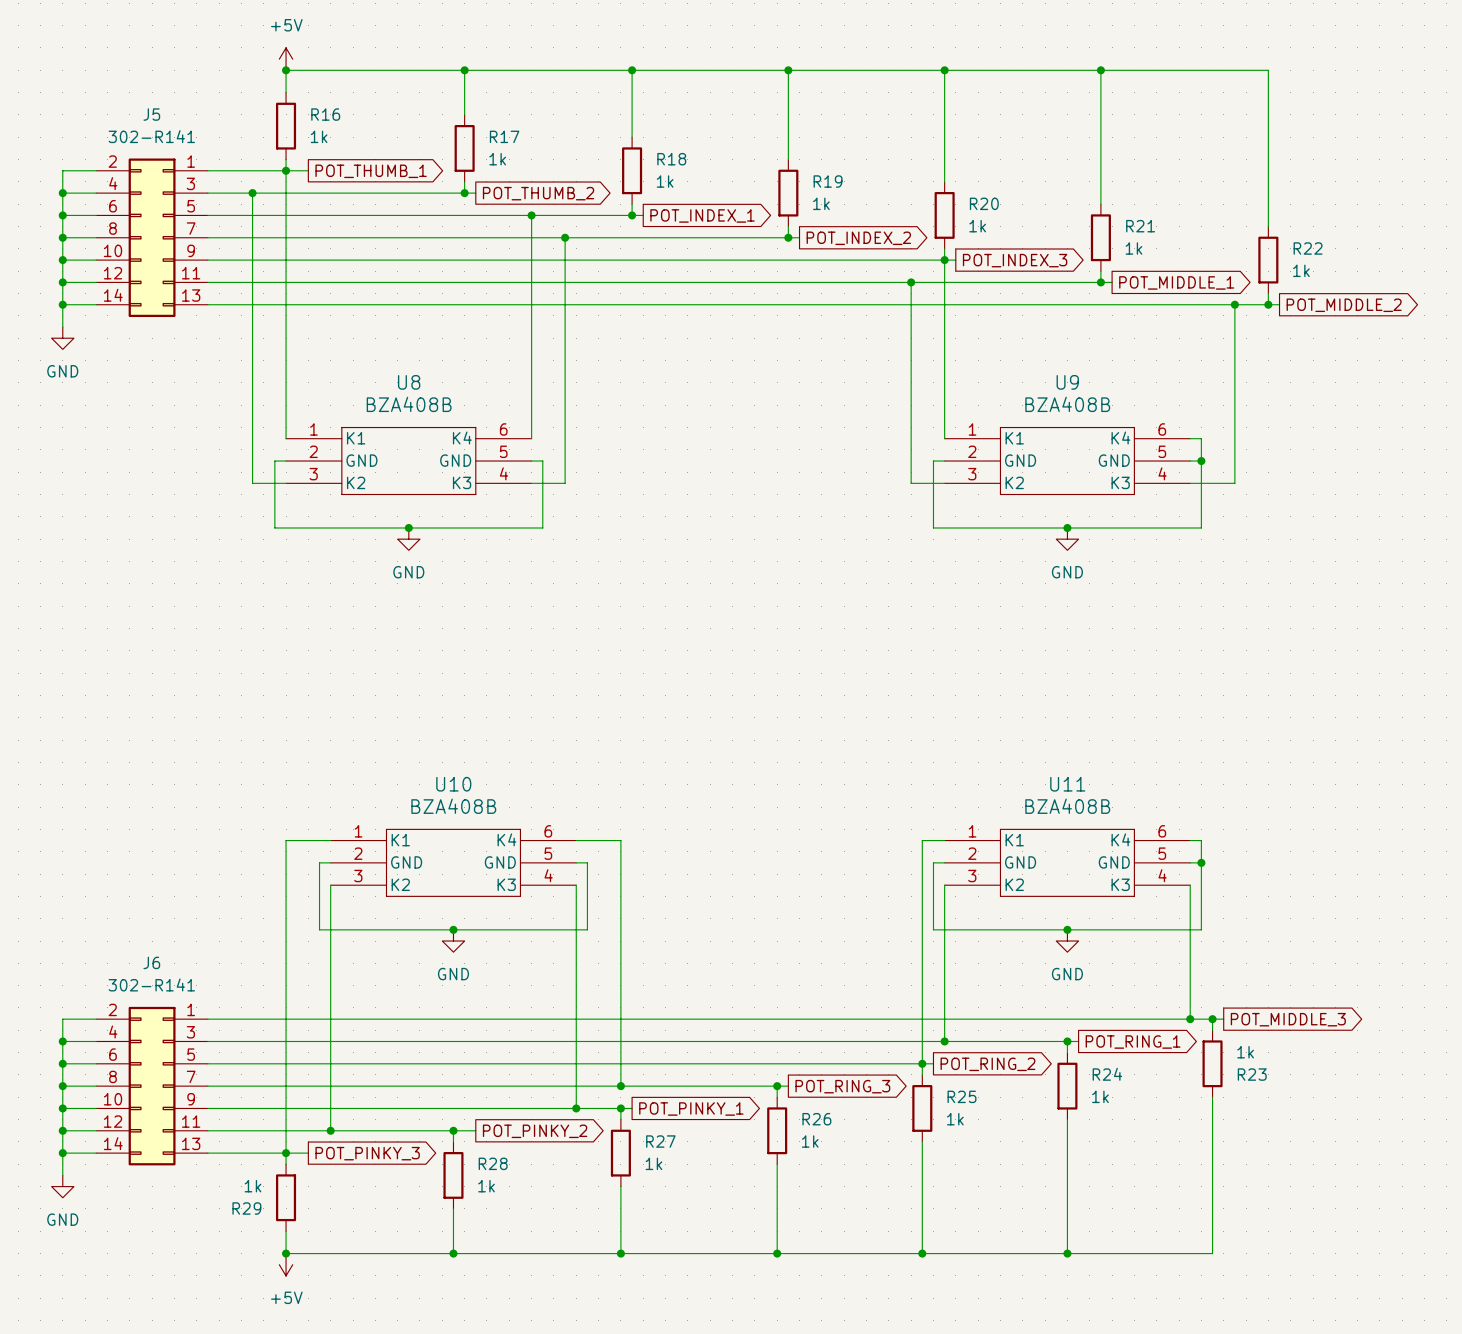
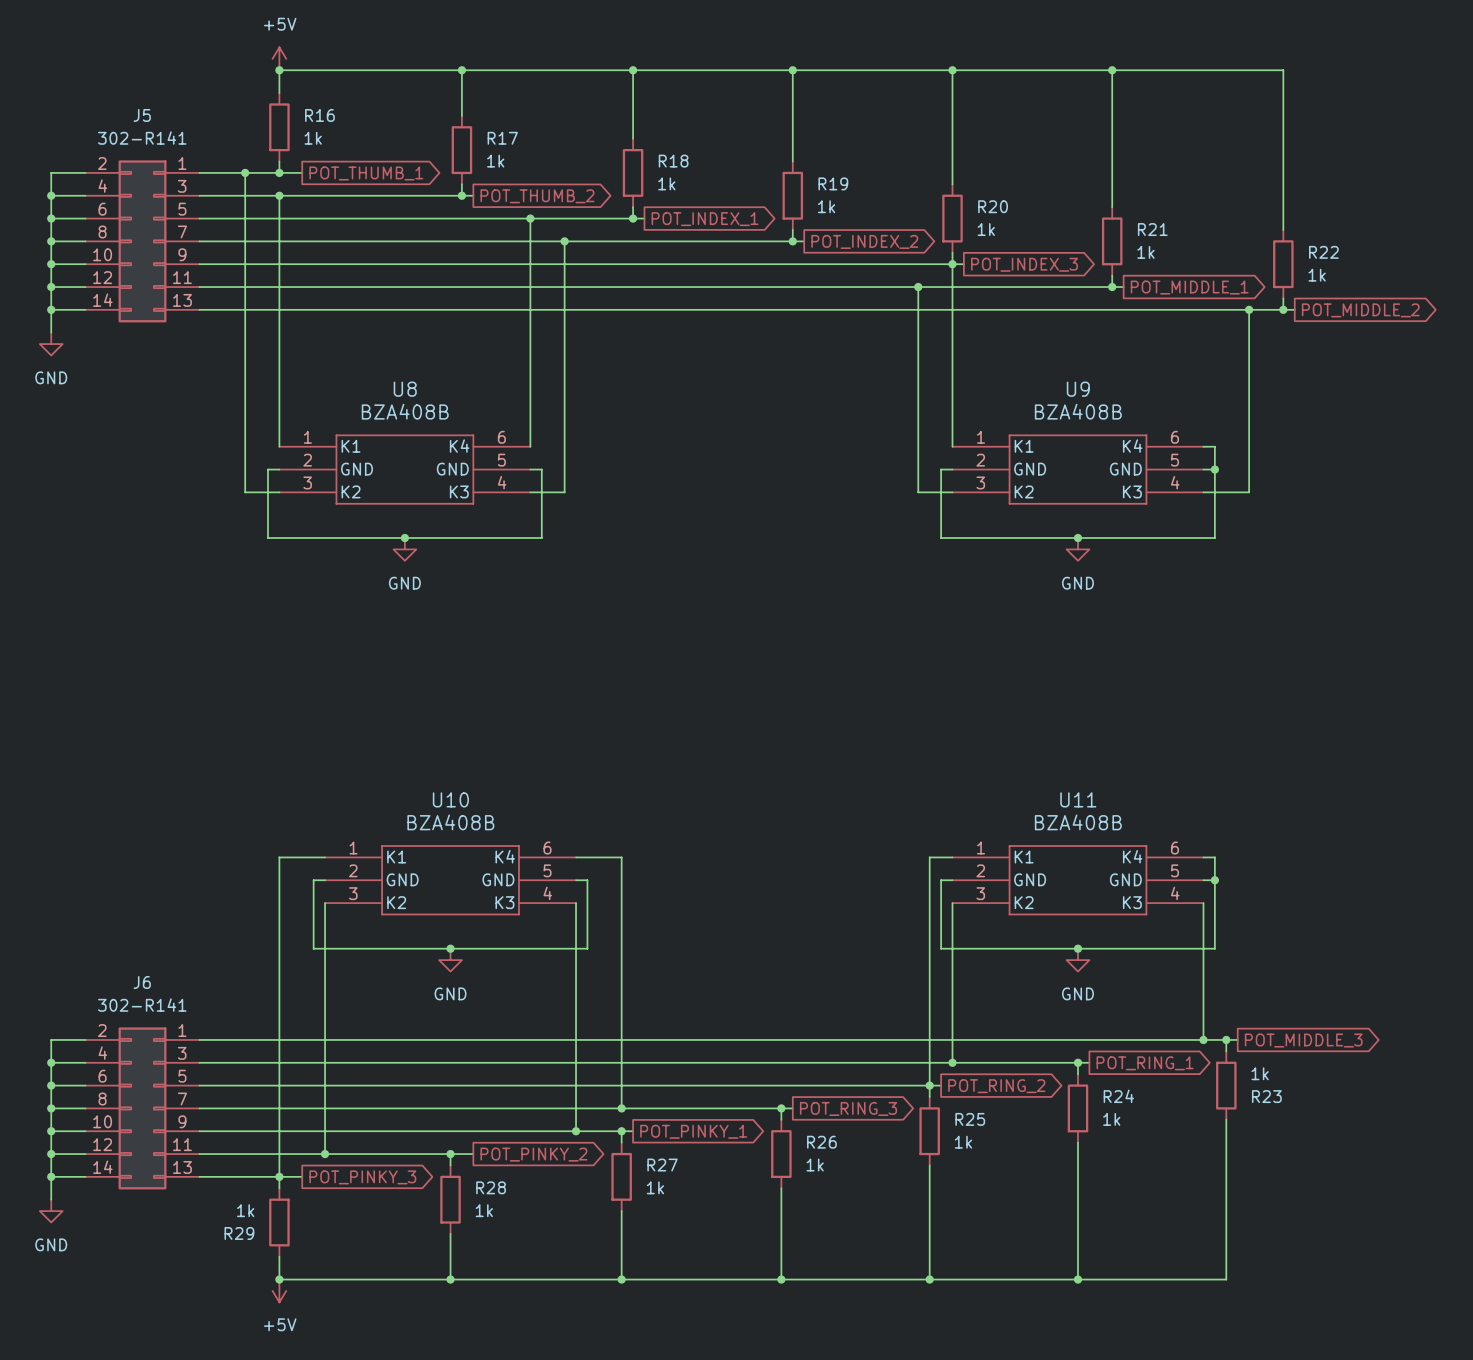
junction: none -> (245, 172)
wire: (286, 170) (286, 193) -> (245, 172) (245, 195)
junction: (252, 193) -> none
junction: none -> (279, 195)

